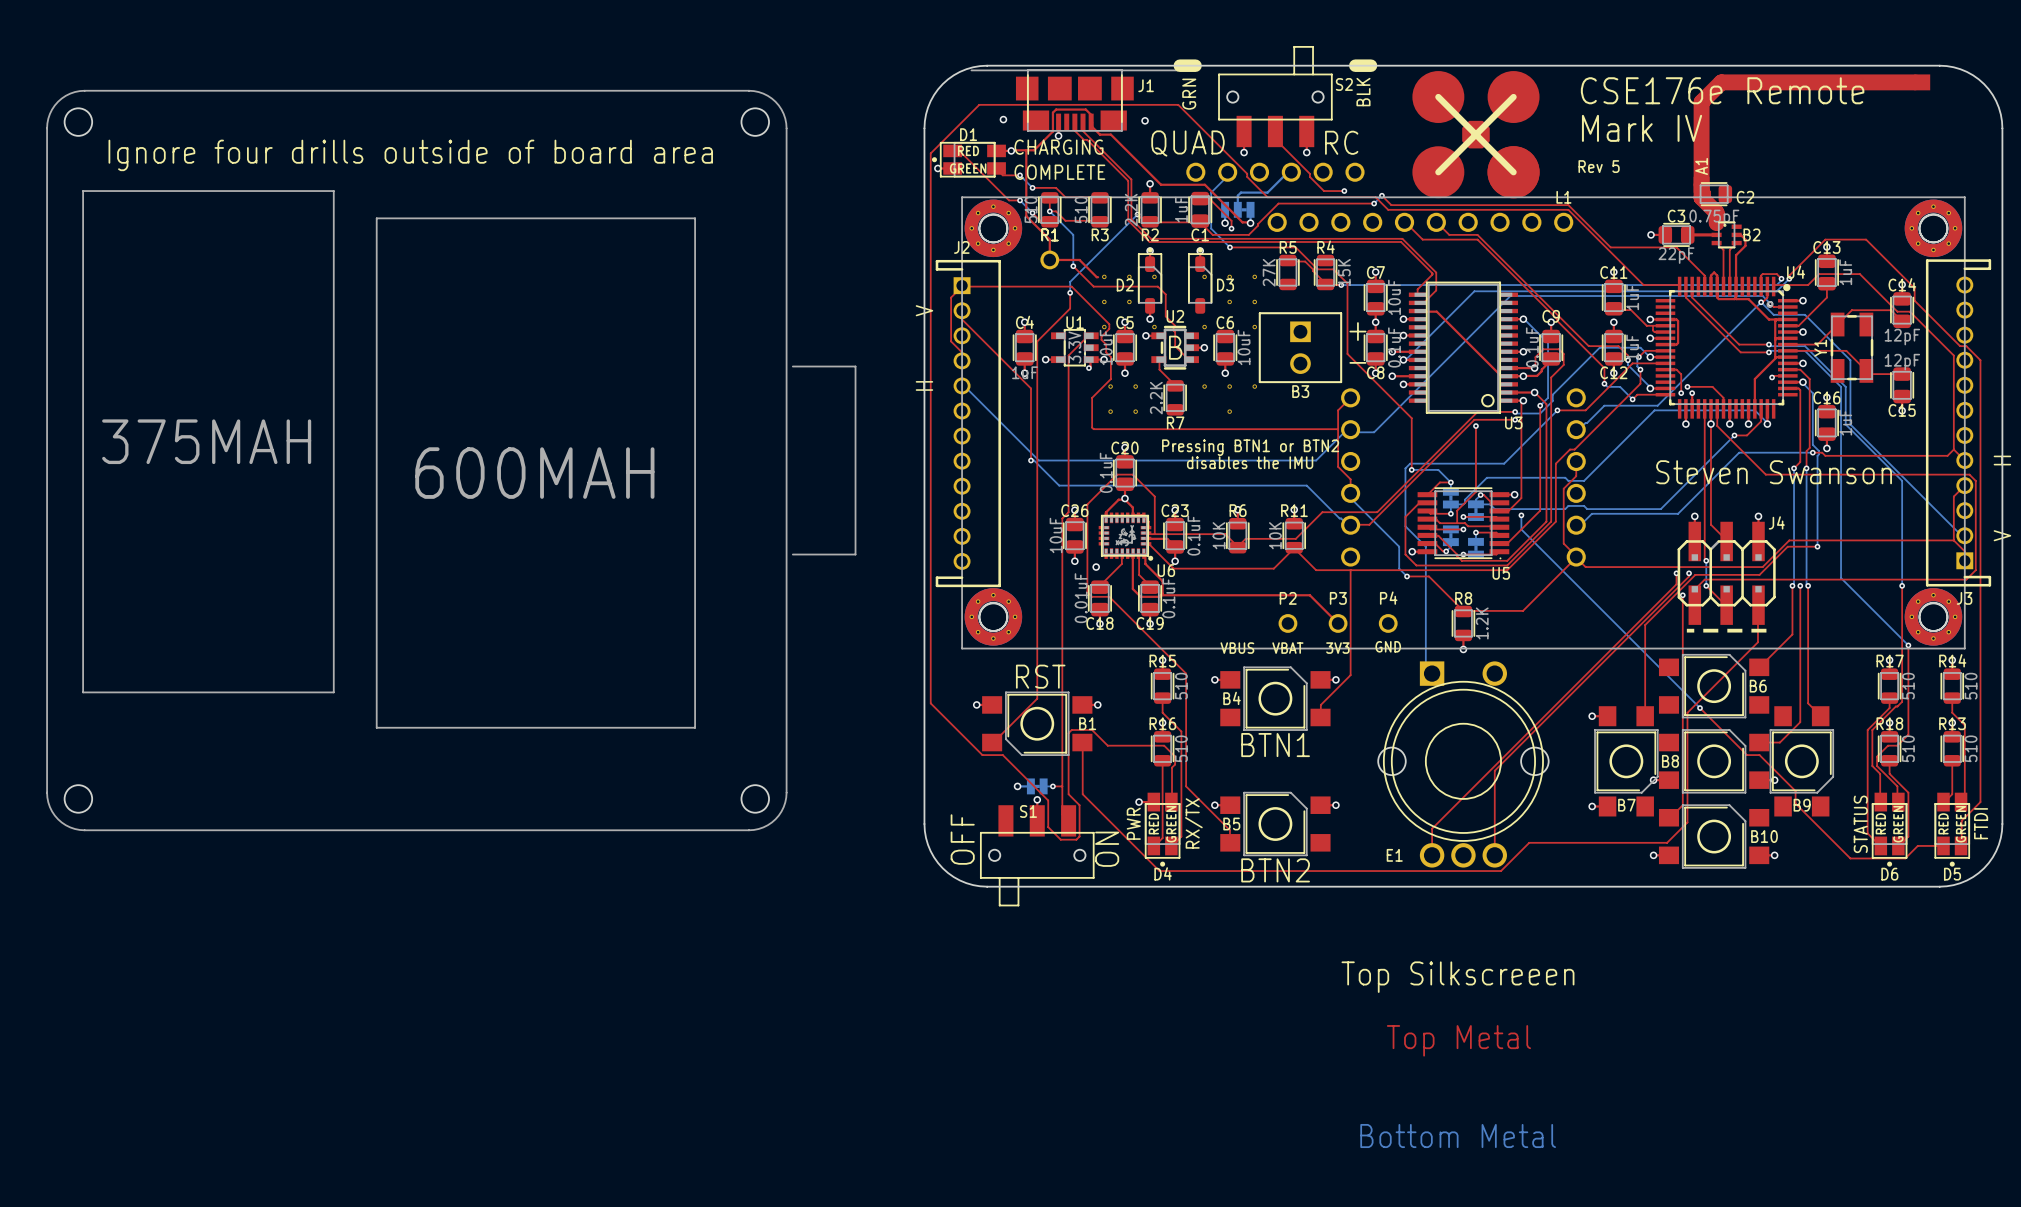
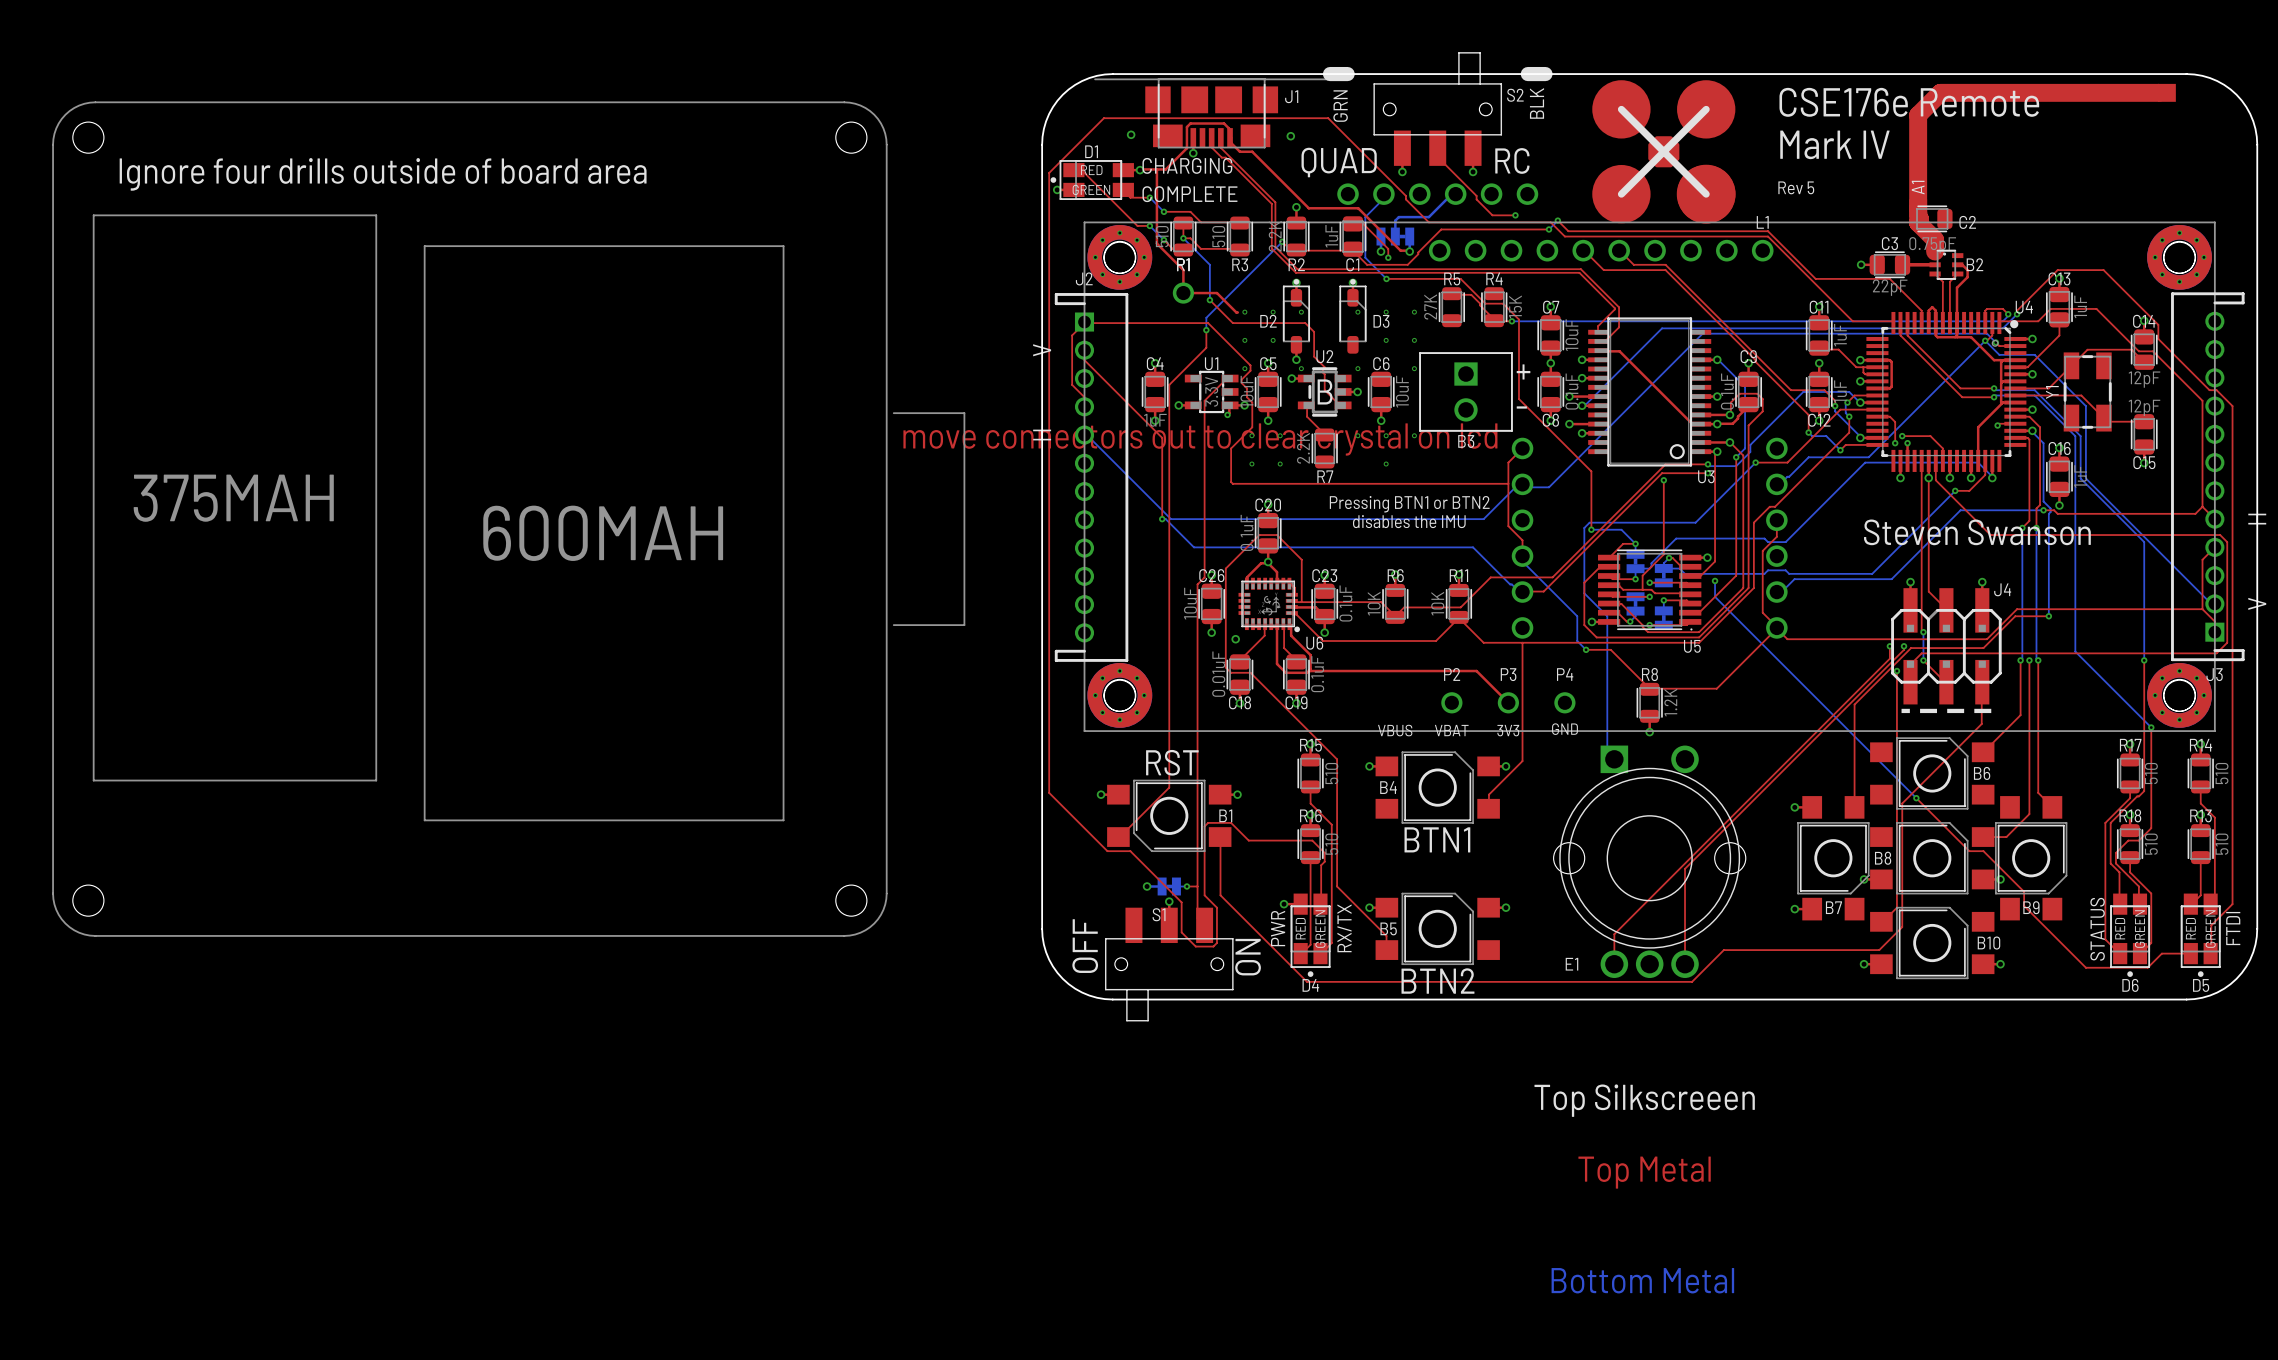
text: none -> move connectors out to clear crystal on lcd (1200, 439)

